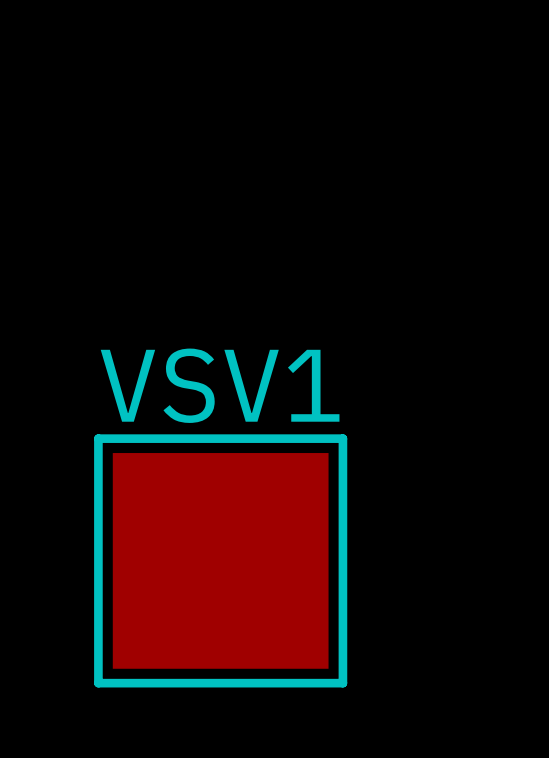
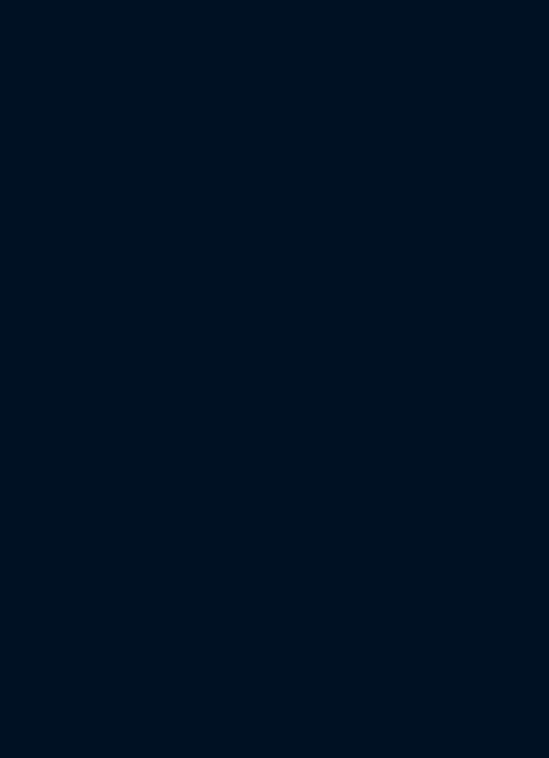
VSV1: (220, 560) -> none

